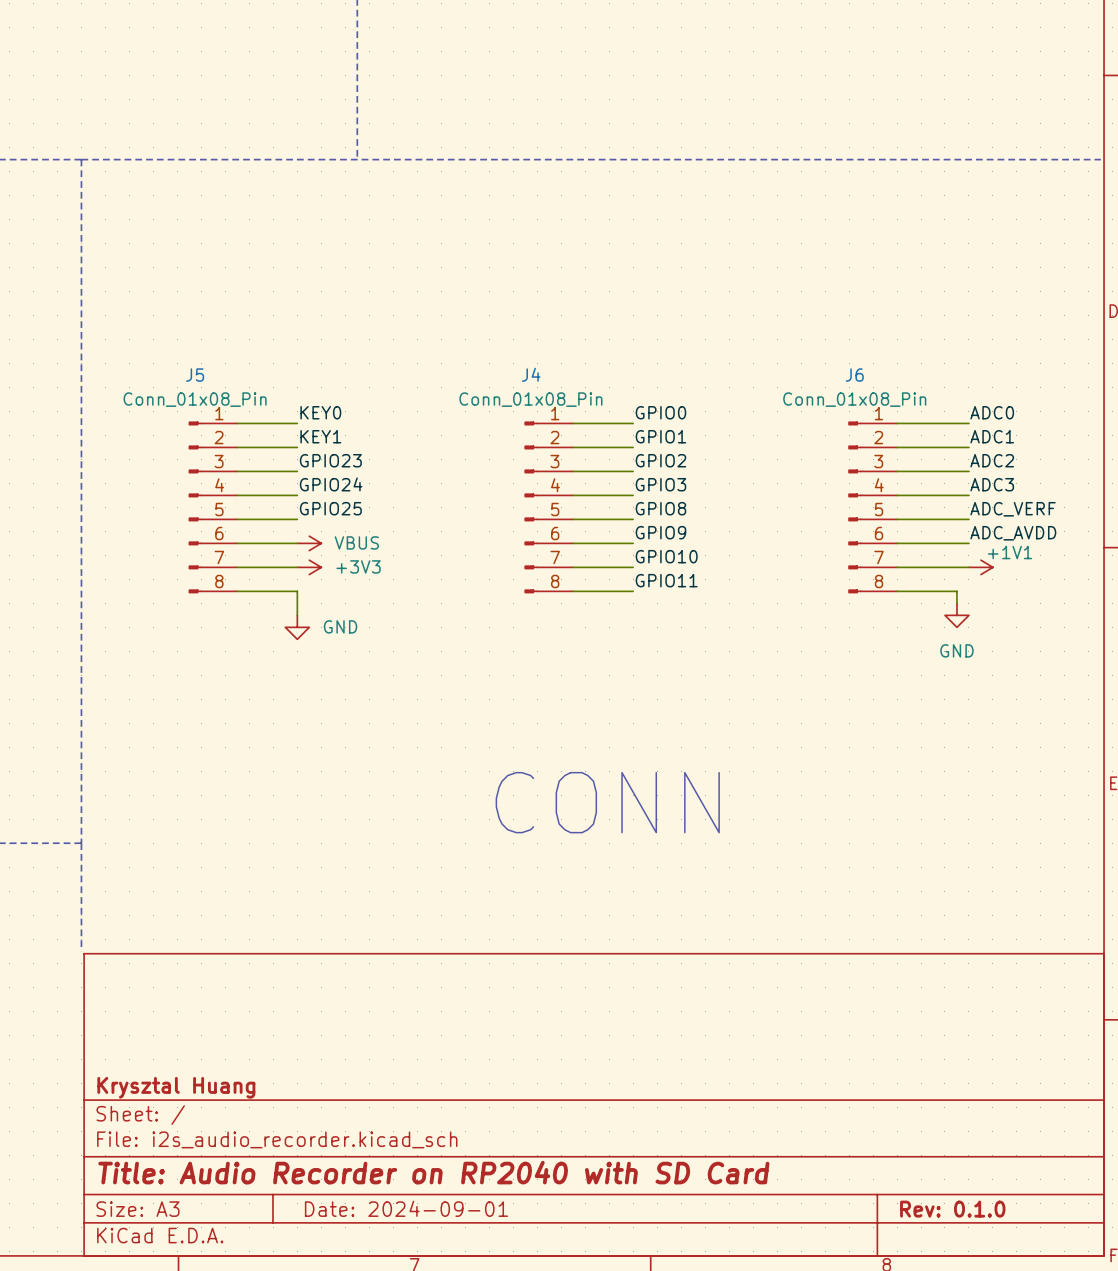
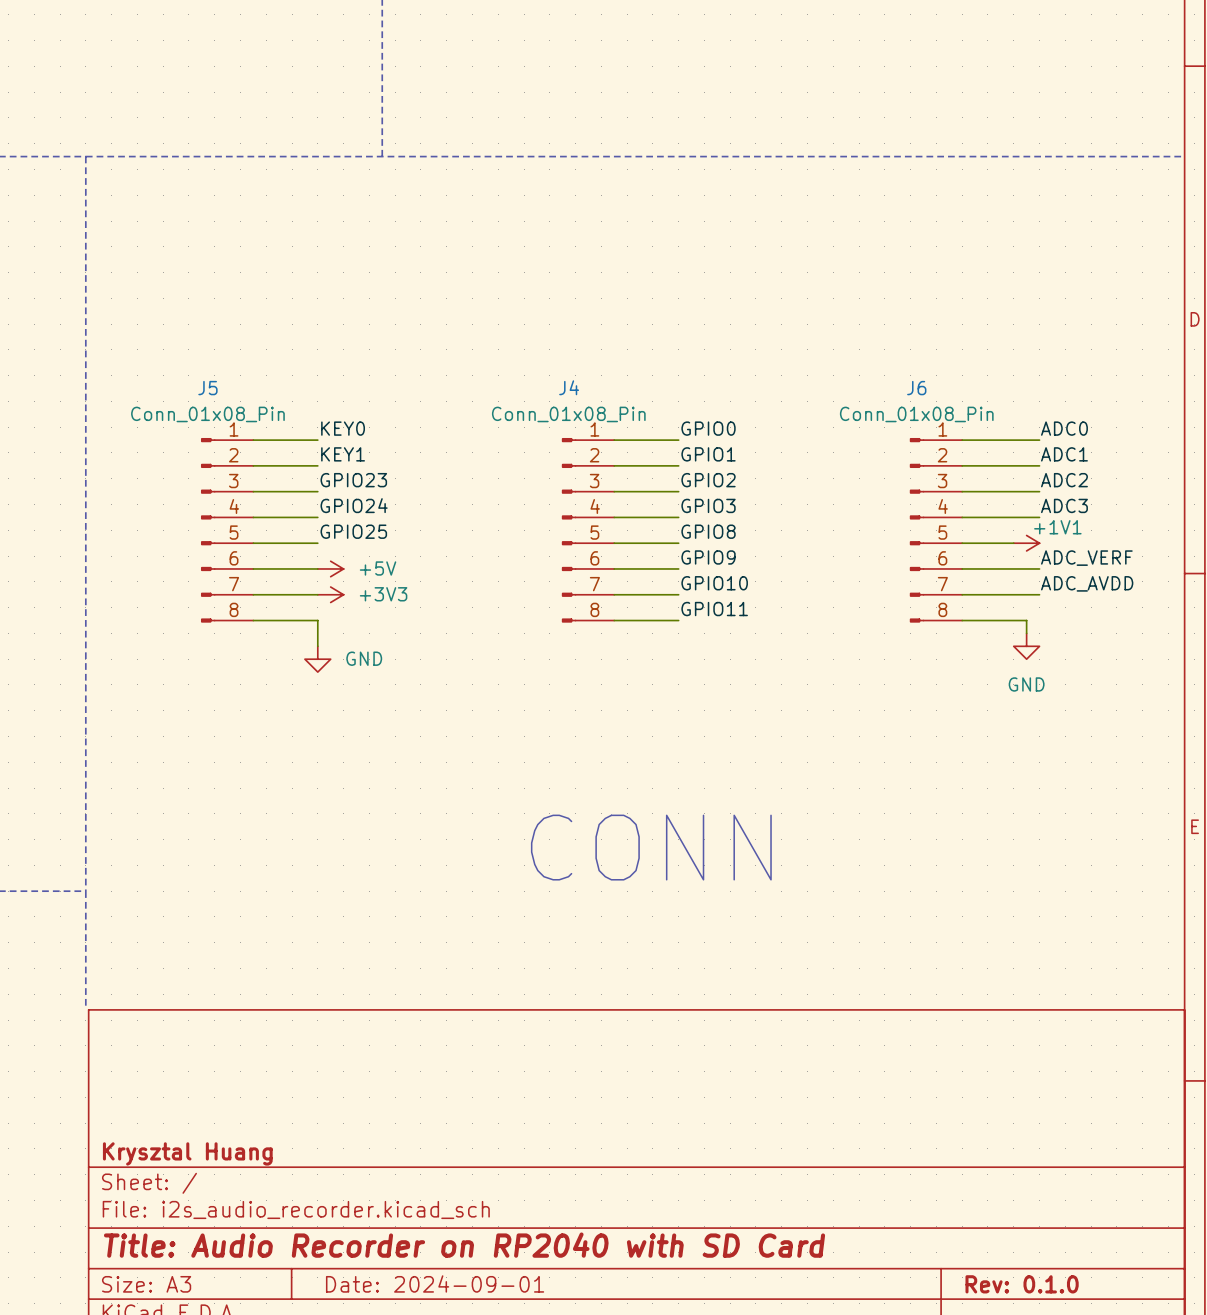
label: ADC_VERF (1013, 509) -> none
label: ADC_AVDD (1013, 533) -> ADC_VERF (1086, 558)
power symbol: VBUS (309, 543) -> +5V (330, 568)
label: none -> ADC_AVDD (1087, 583)
power symbol position: +1V1 (980, 567) -> +1V1 (1026, 543)

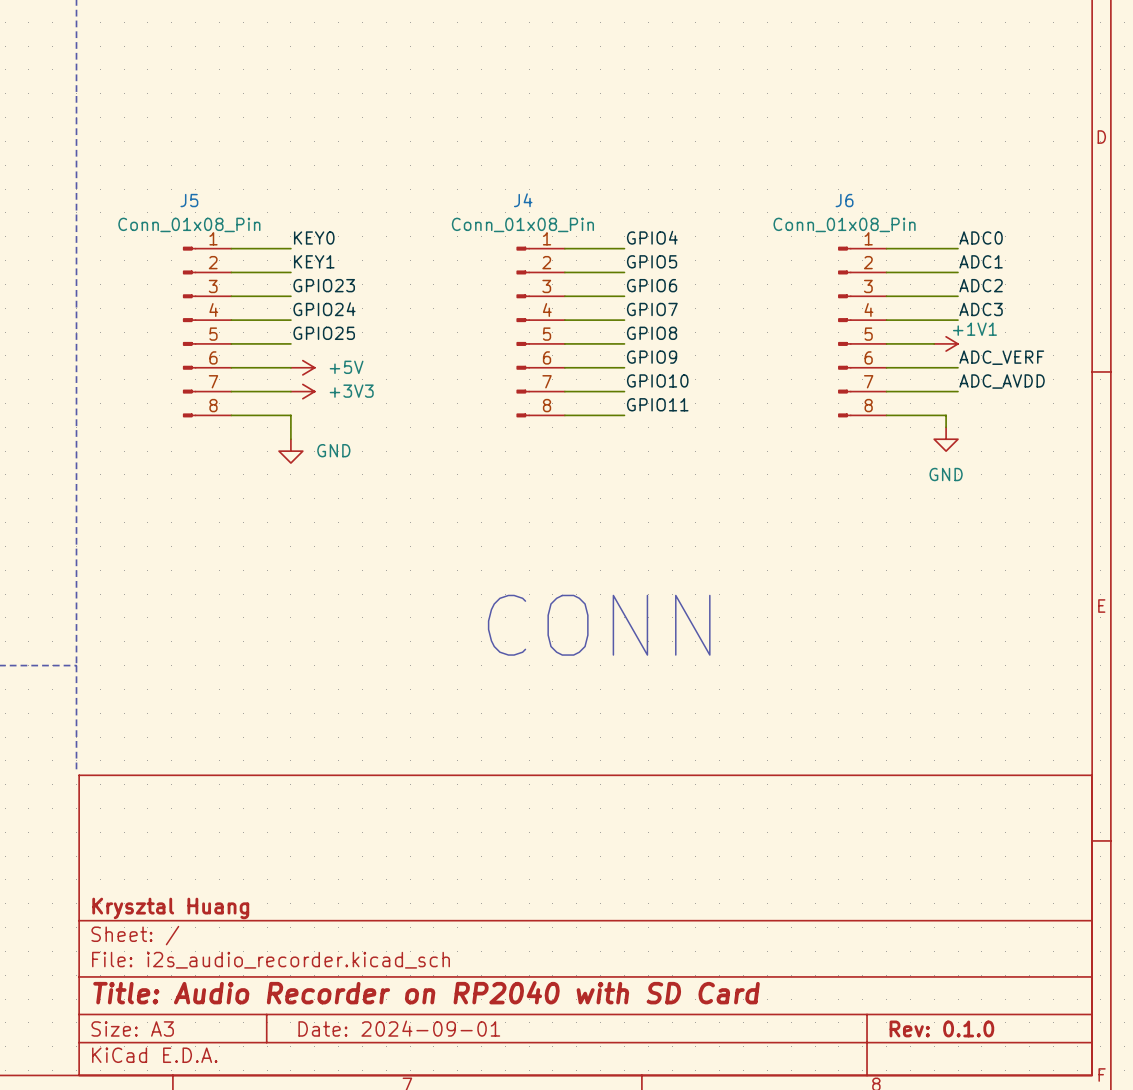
label: GPIO0 (708, 428) -> GPIO4 (652, 237)
label: GPIO1 (708, 454) -> GPIO5 (652, 261)
label: GPIO2 (708, 480) -> GPIO6 (652, 285)
label: GPIO3 (708, 505) -> GPIO7 (652, 309)

